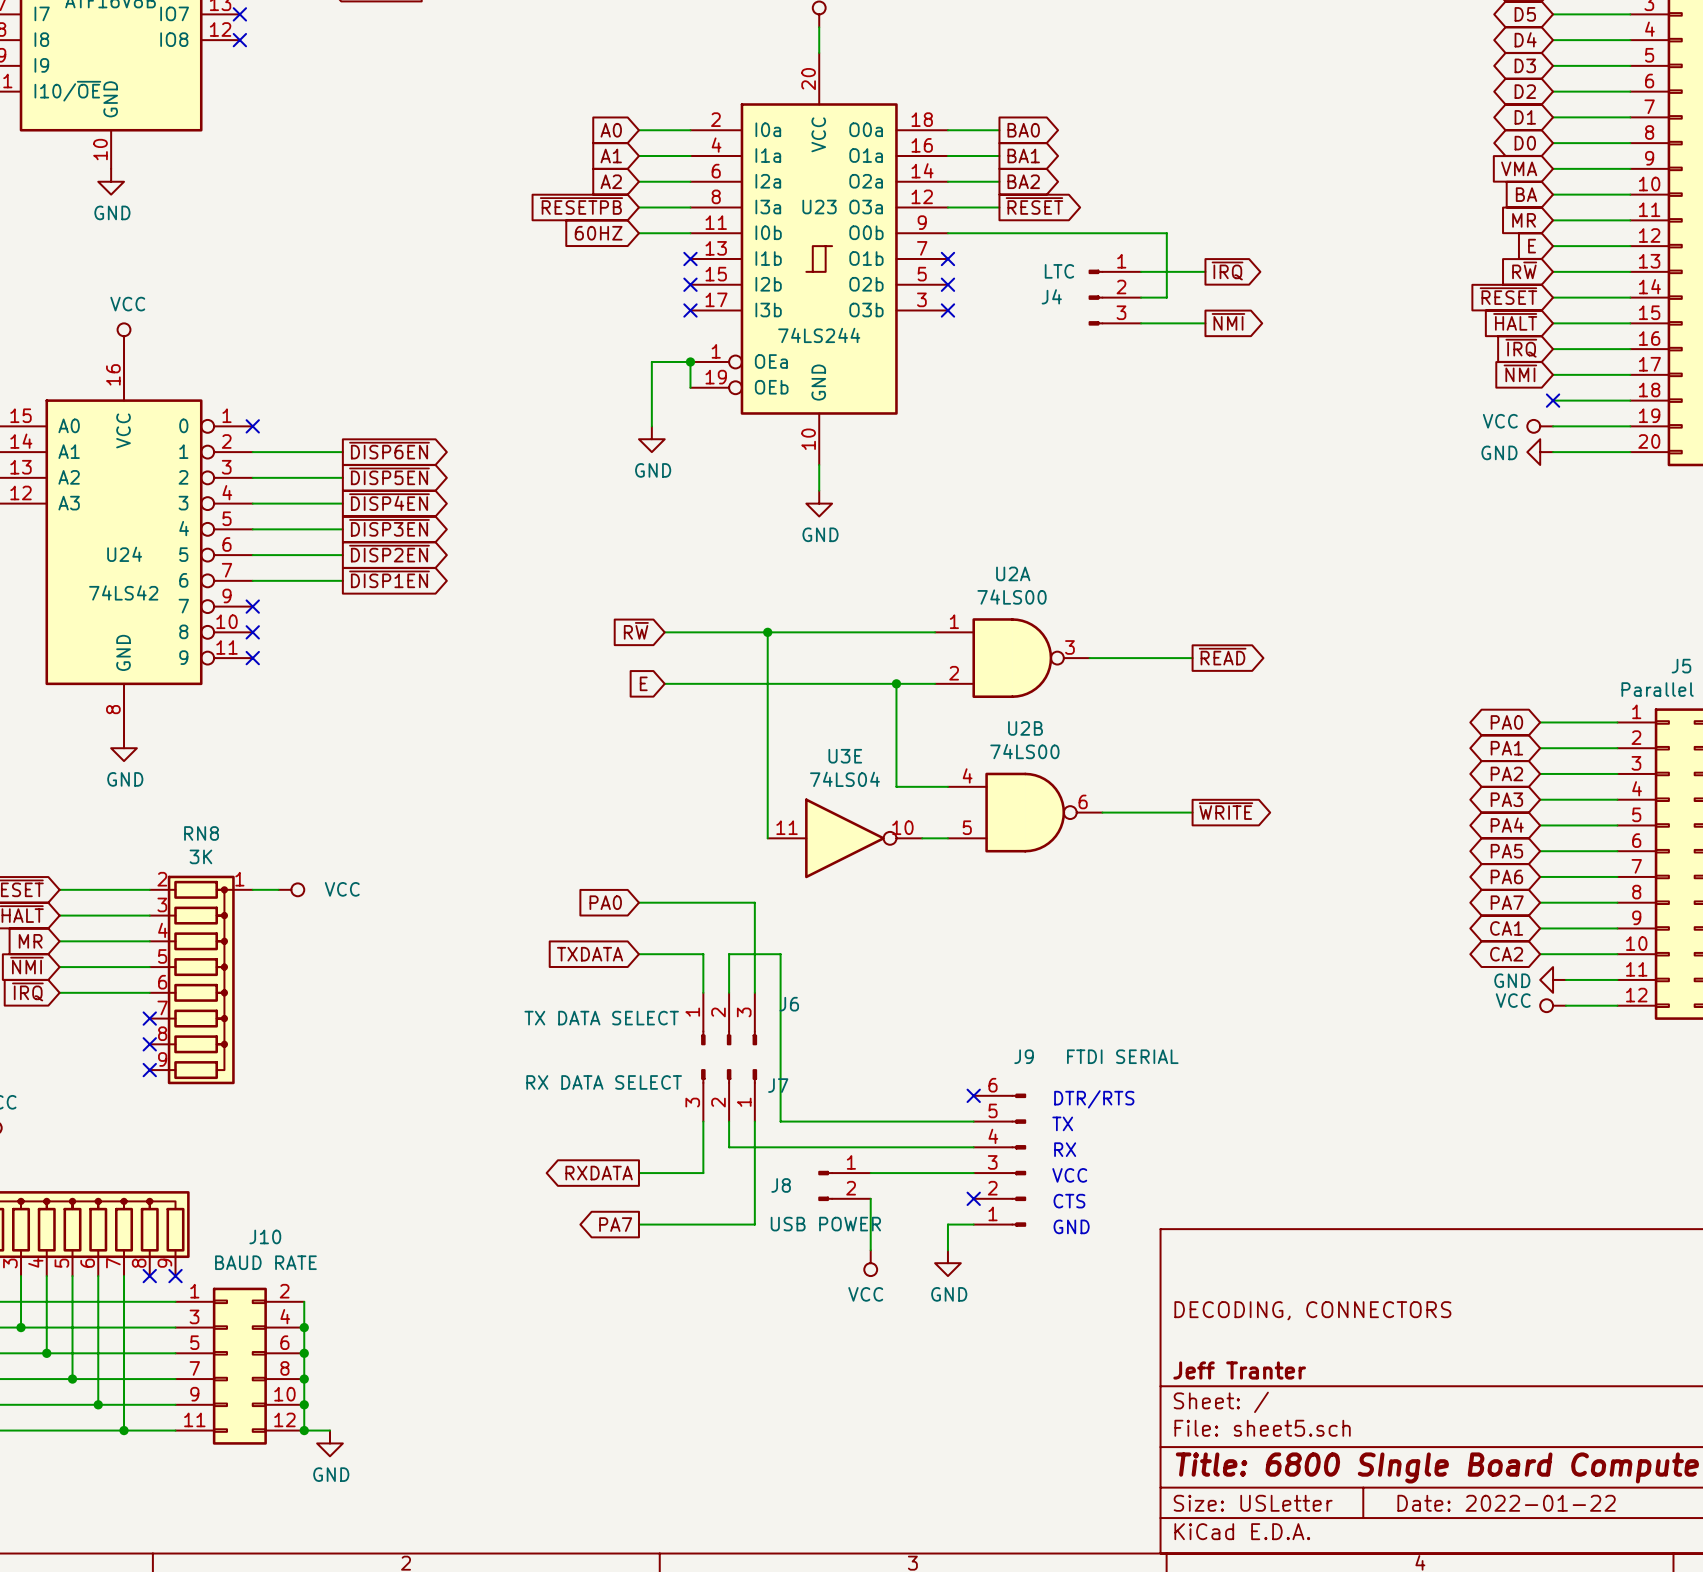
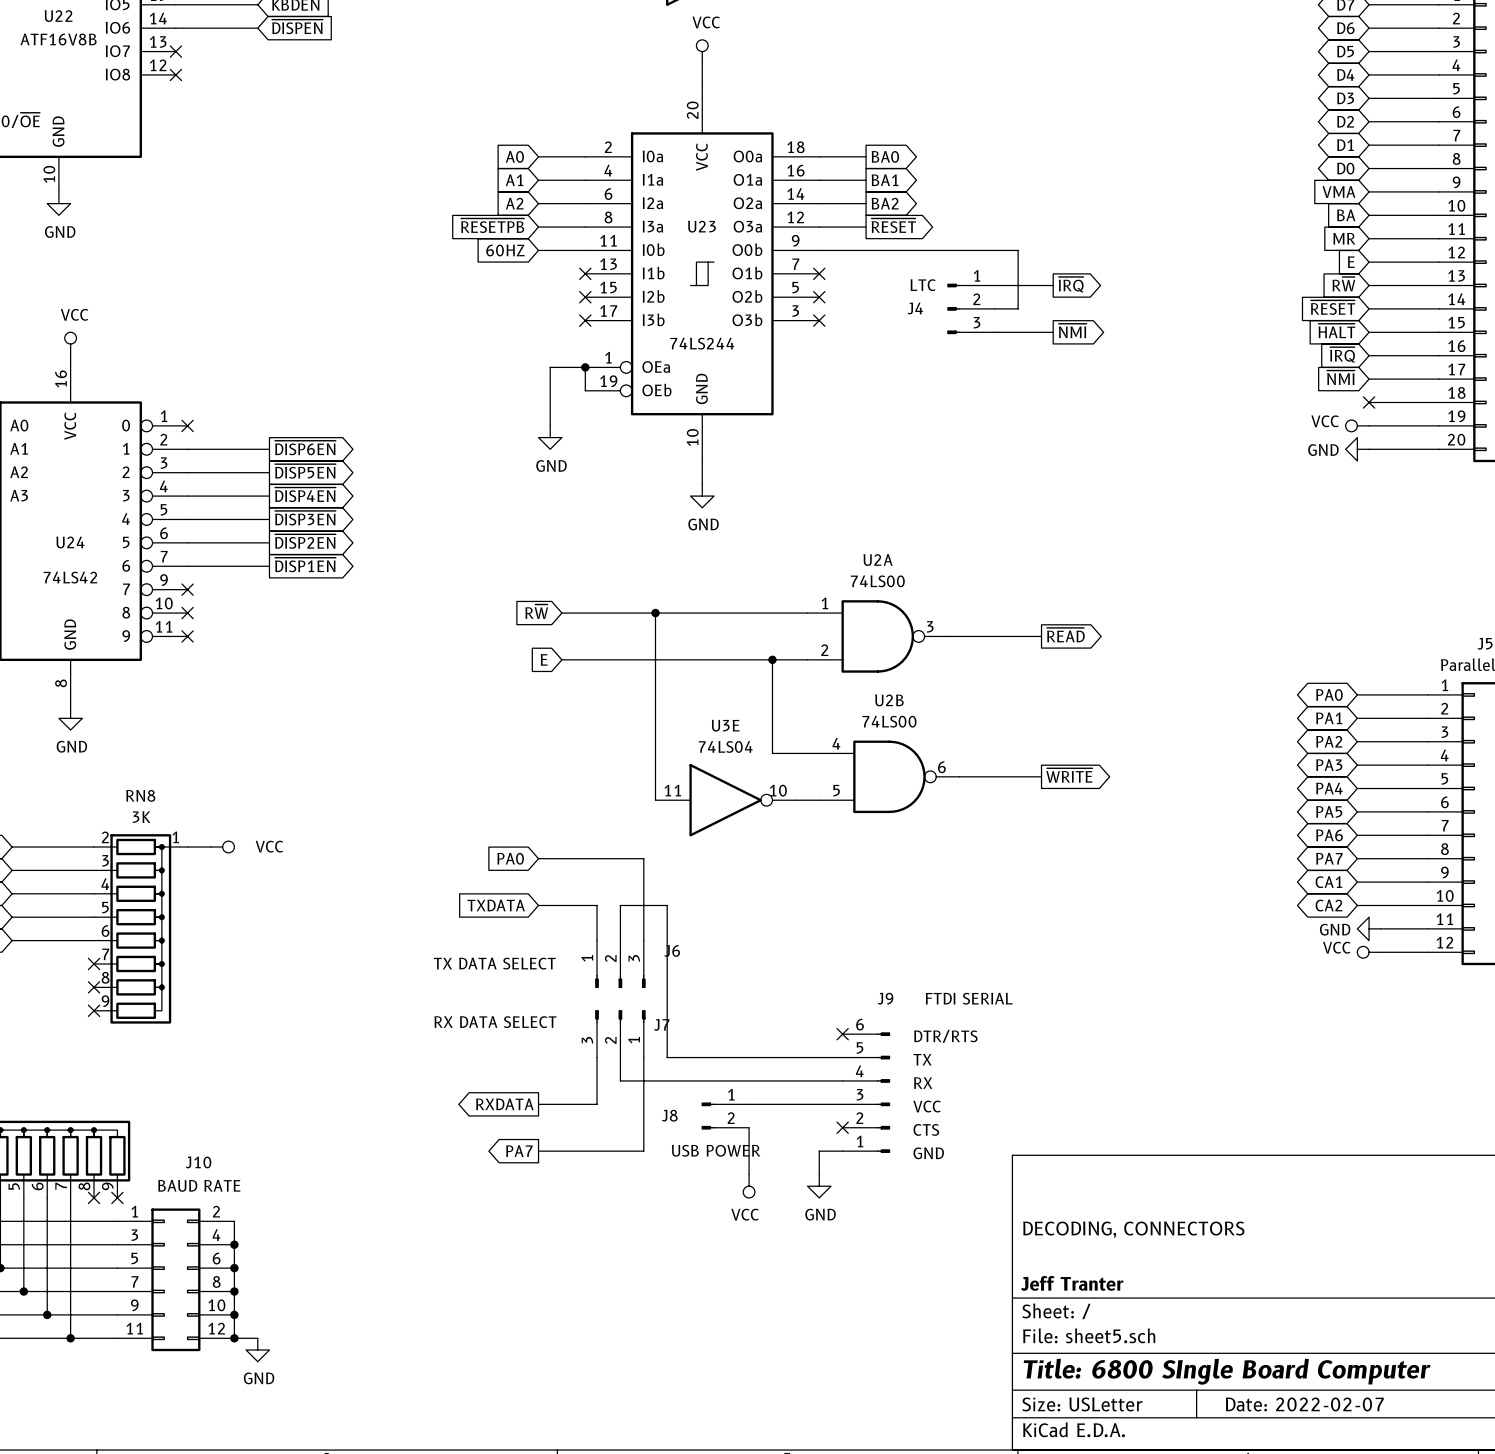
title block: Date: 2022-01-22 (1506, 1503) -> Date: 2022-02-07 (1304, 1404)

